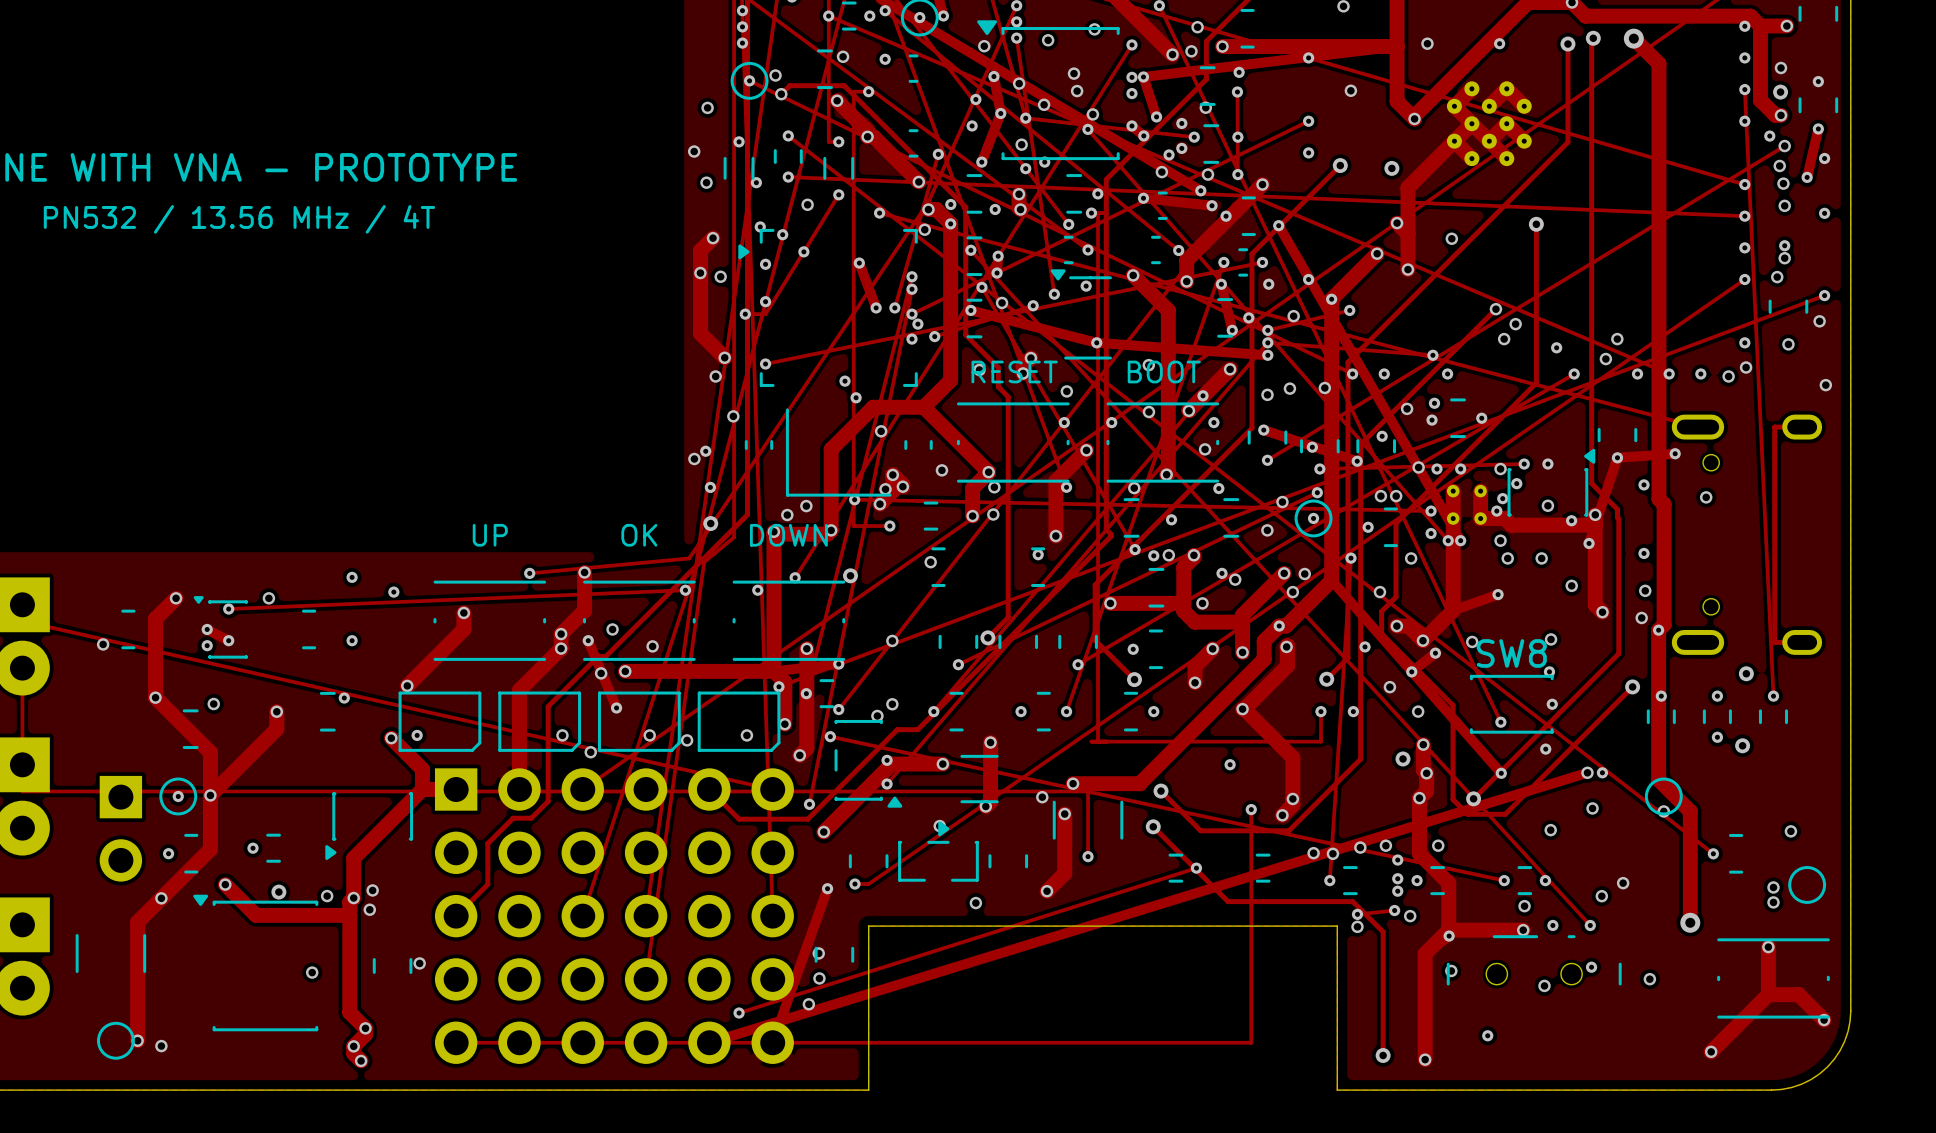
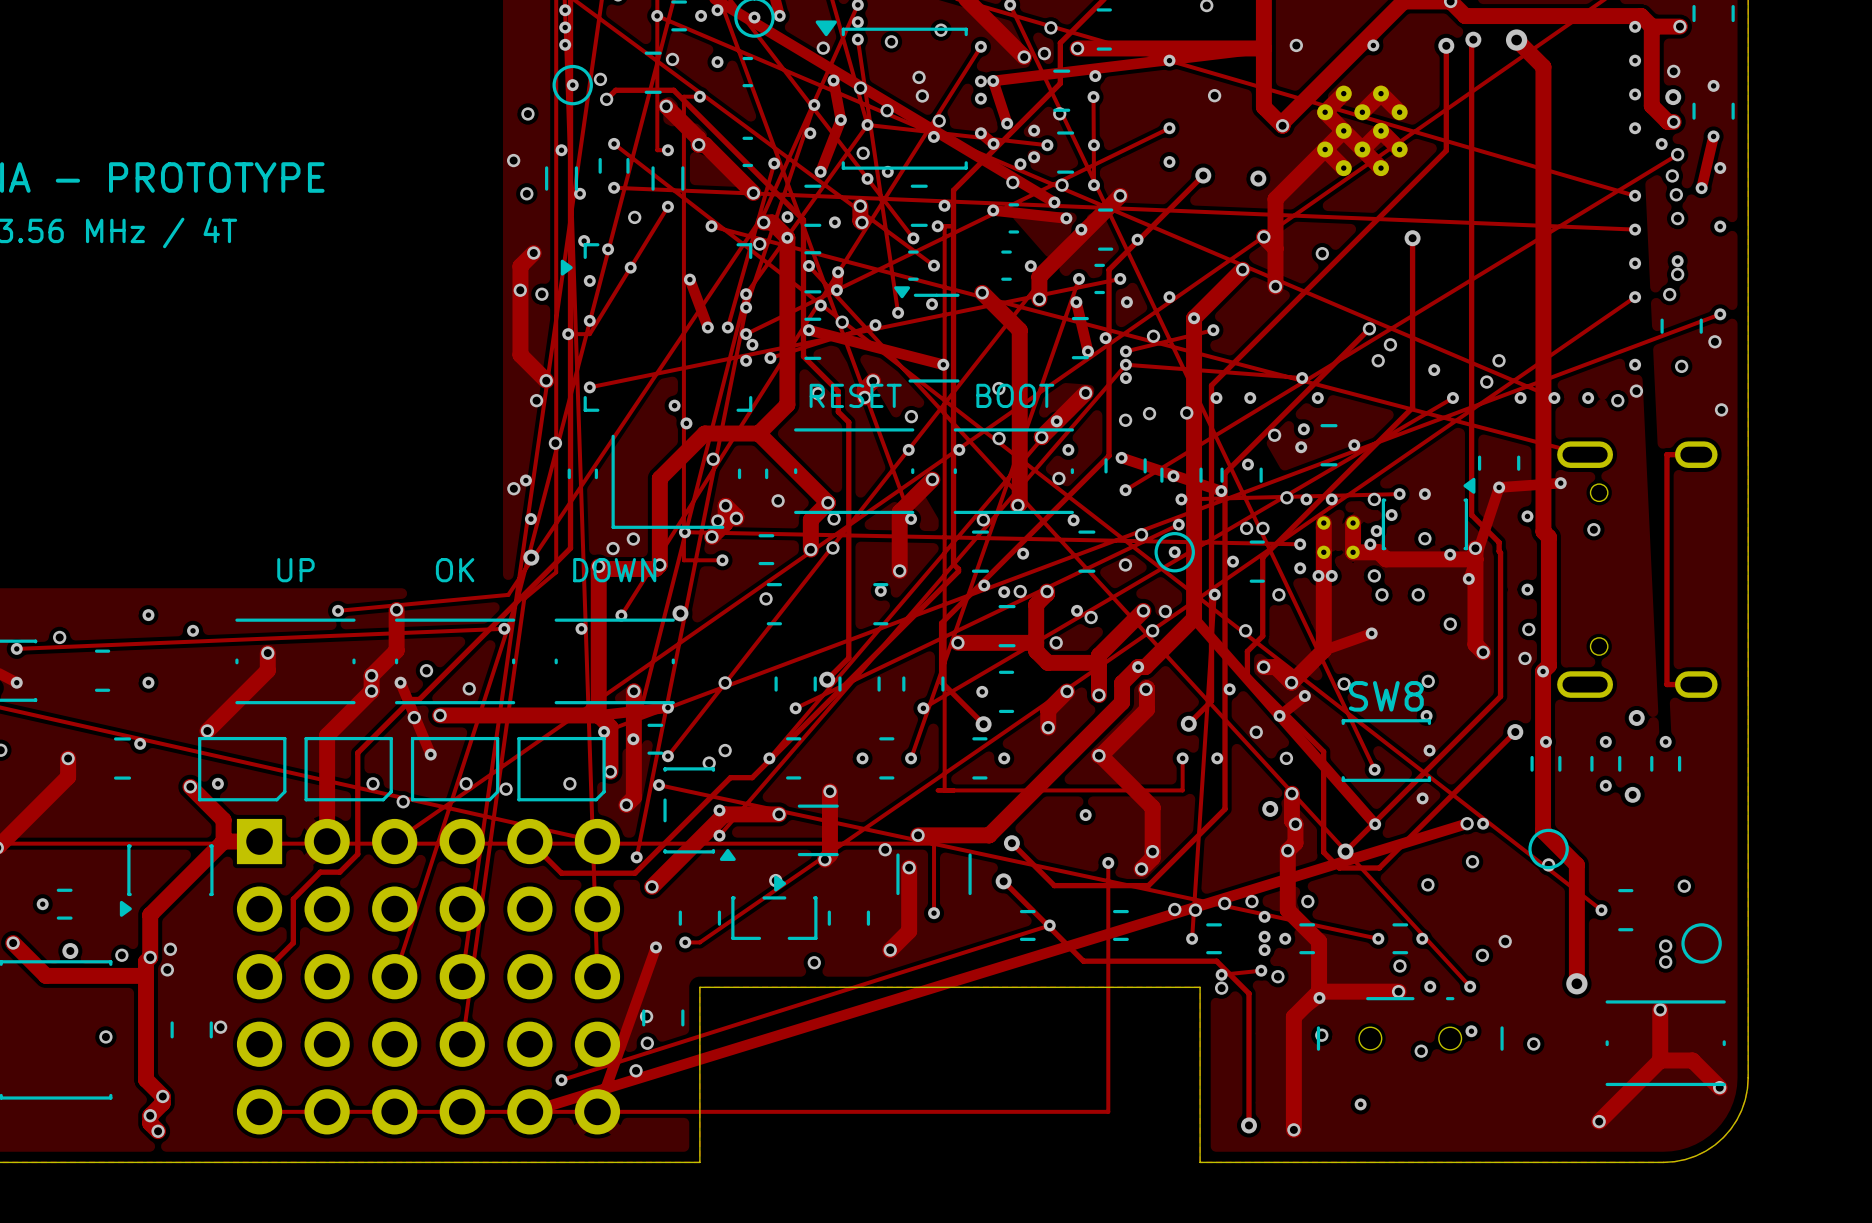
track: (885, 10) (1178, 250) -> none
track: (749, 80) (1352, 373) -> none
track: (1744, 89) (1773, 696) -> none
track: none -> (814, 105) (746, 307)
track: none -> (867, 124) (746, 294)
track: (1087, 129) (1448, 540) -> none
track: (1278, 225) (1460, 540) -> none
track: (981, 287) (1135, 549) -> none
track: (1096, 342) (1267, 355) -> none

